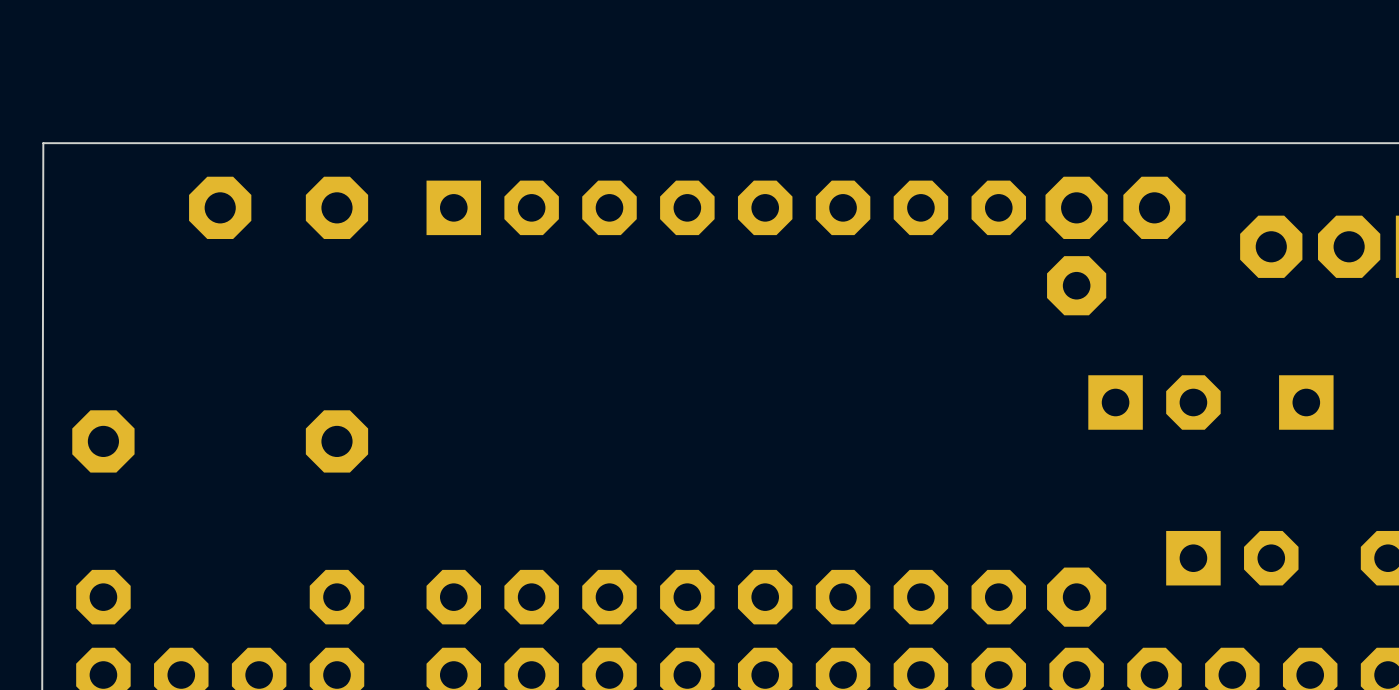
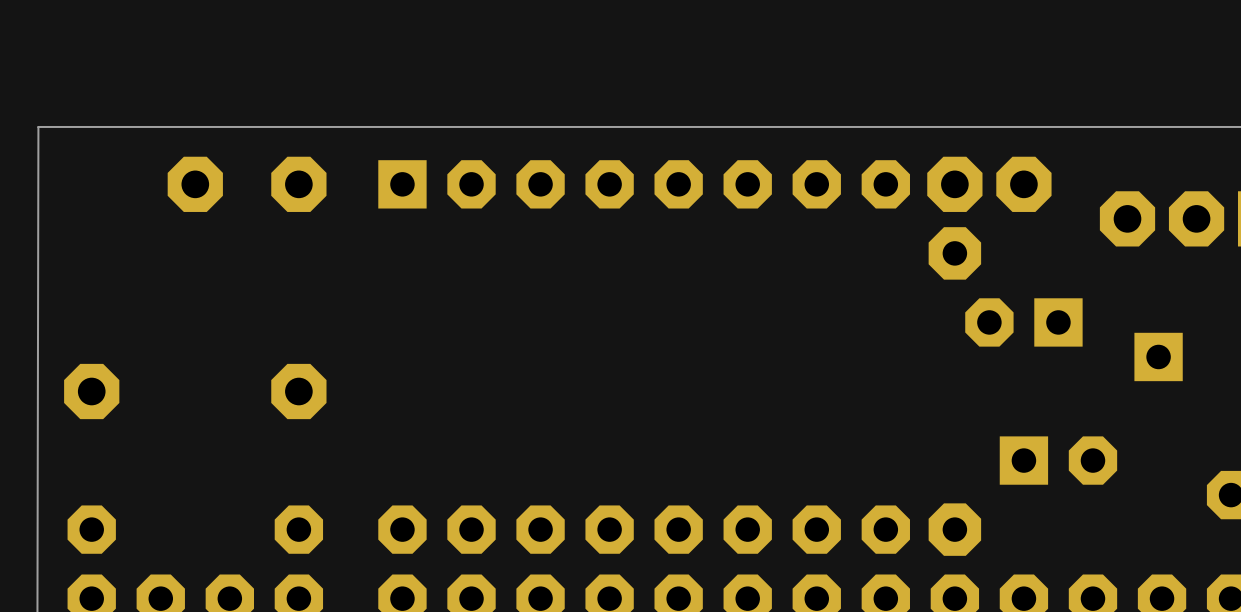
part rotation: 0° (1154, 402) -> 180° (1023, 322)
part position: (1232, 558) -> (1058, 460)

